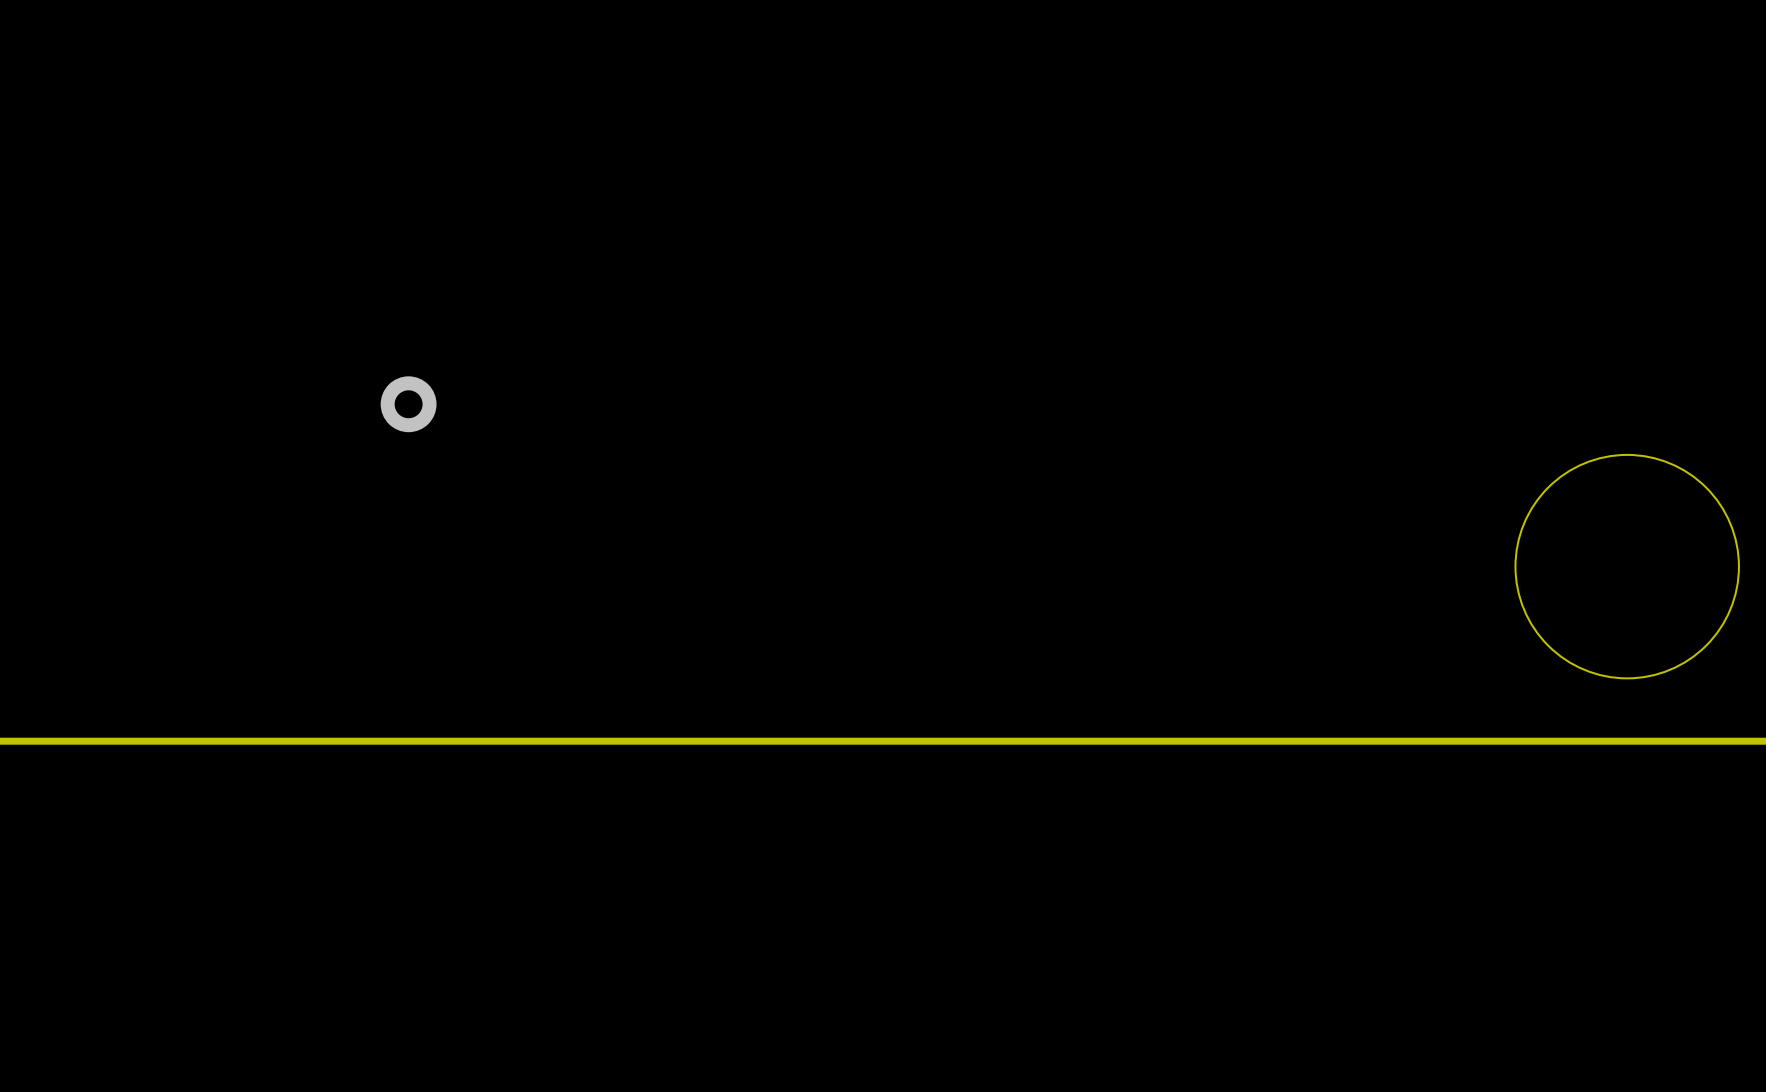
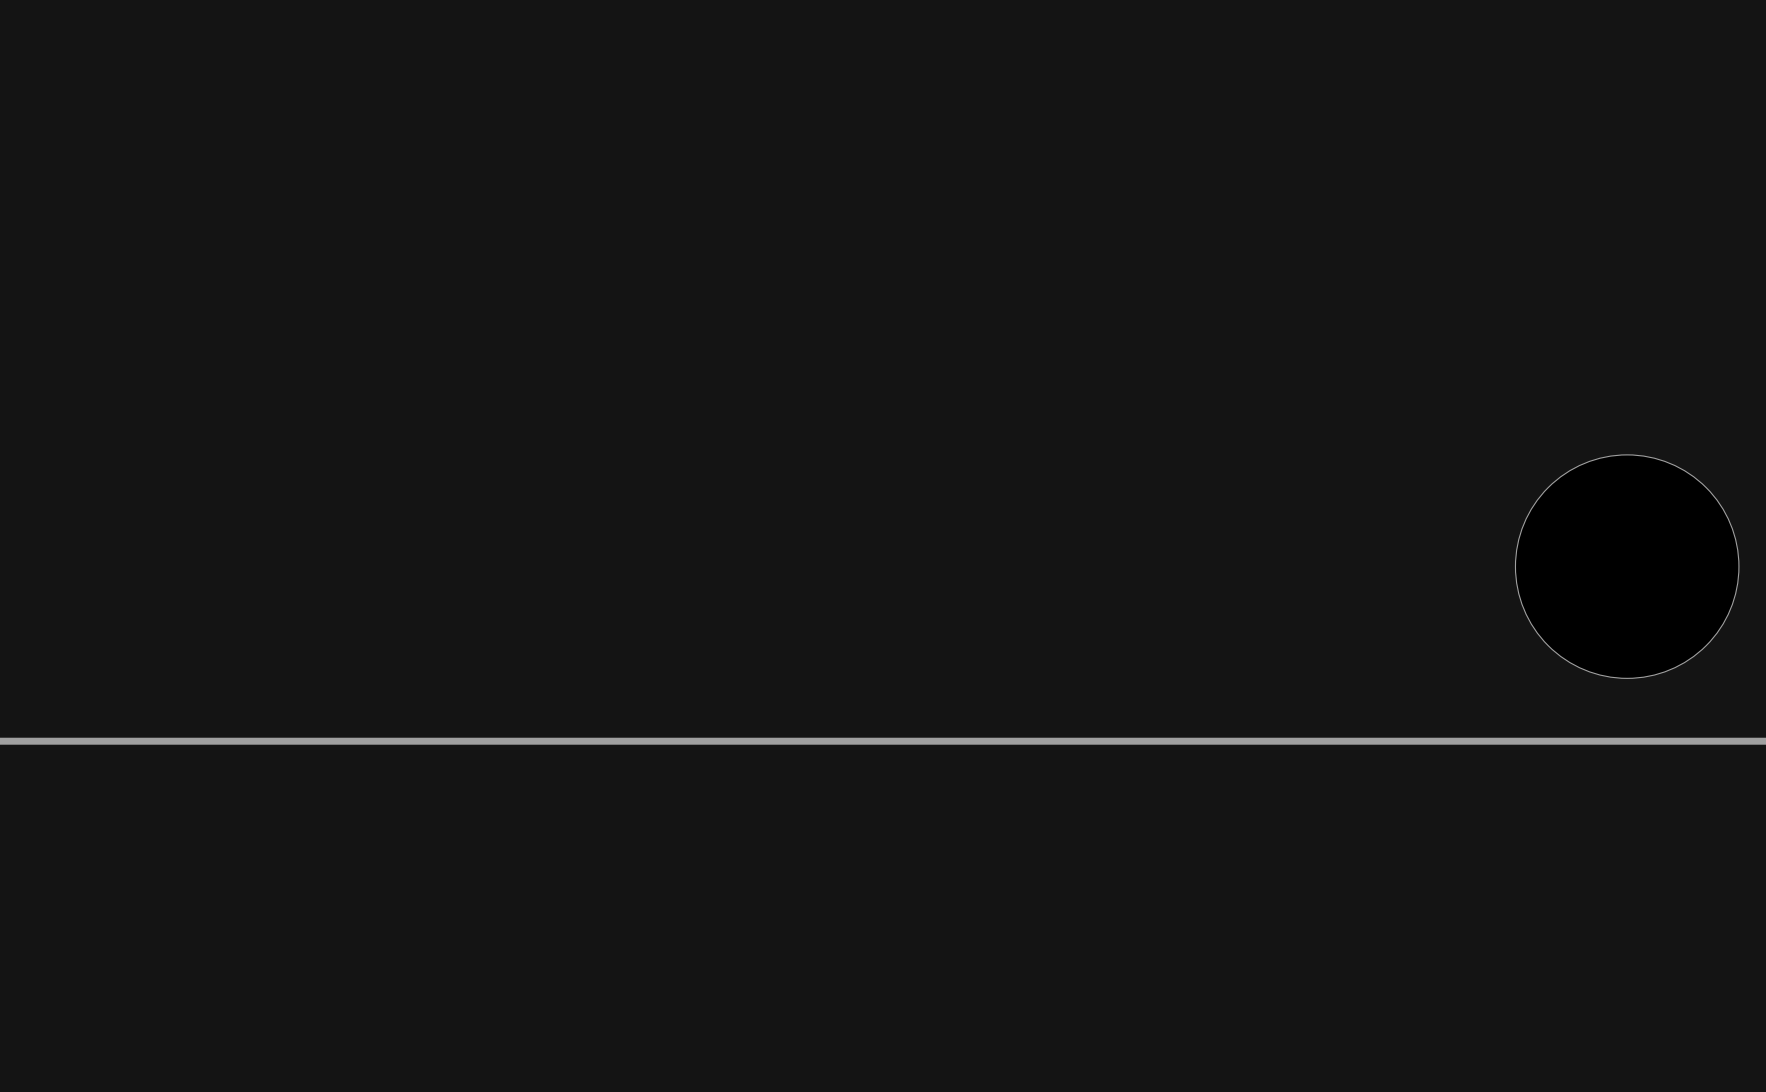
via: (408, 404) -> none

